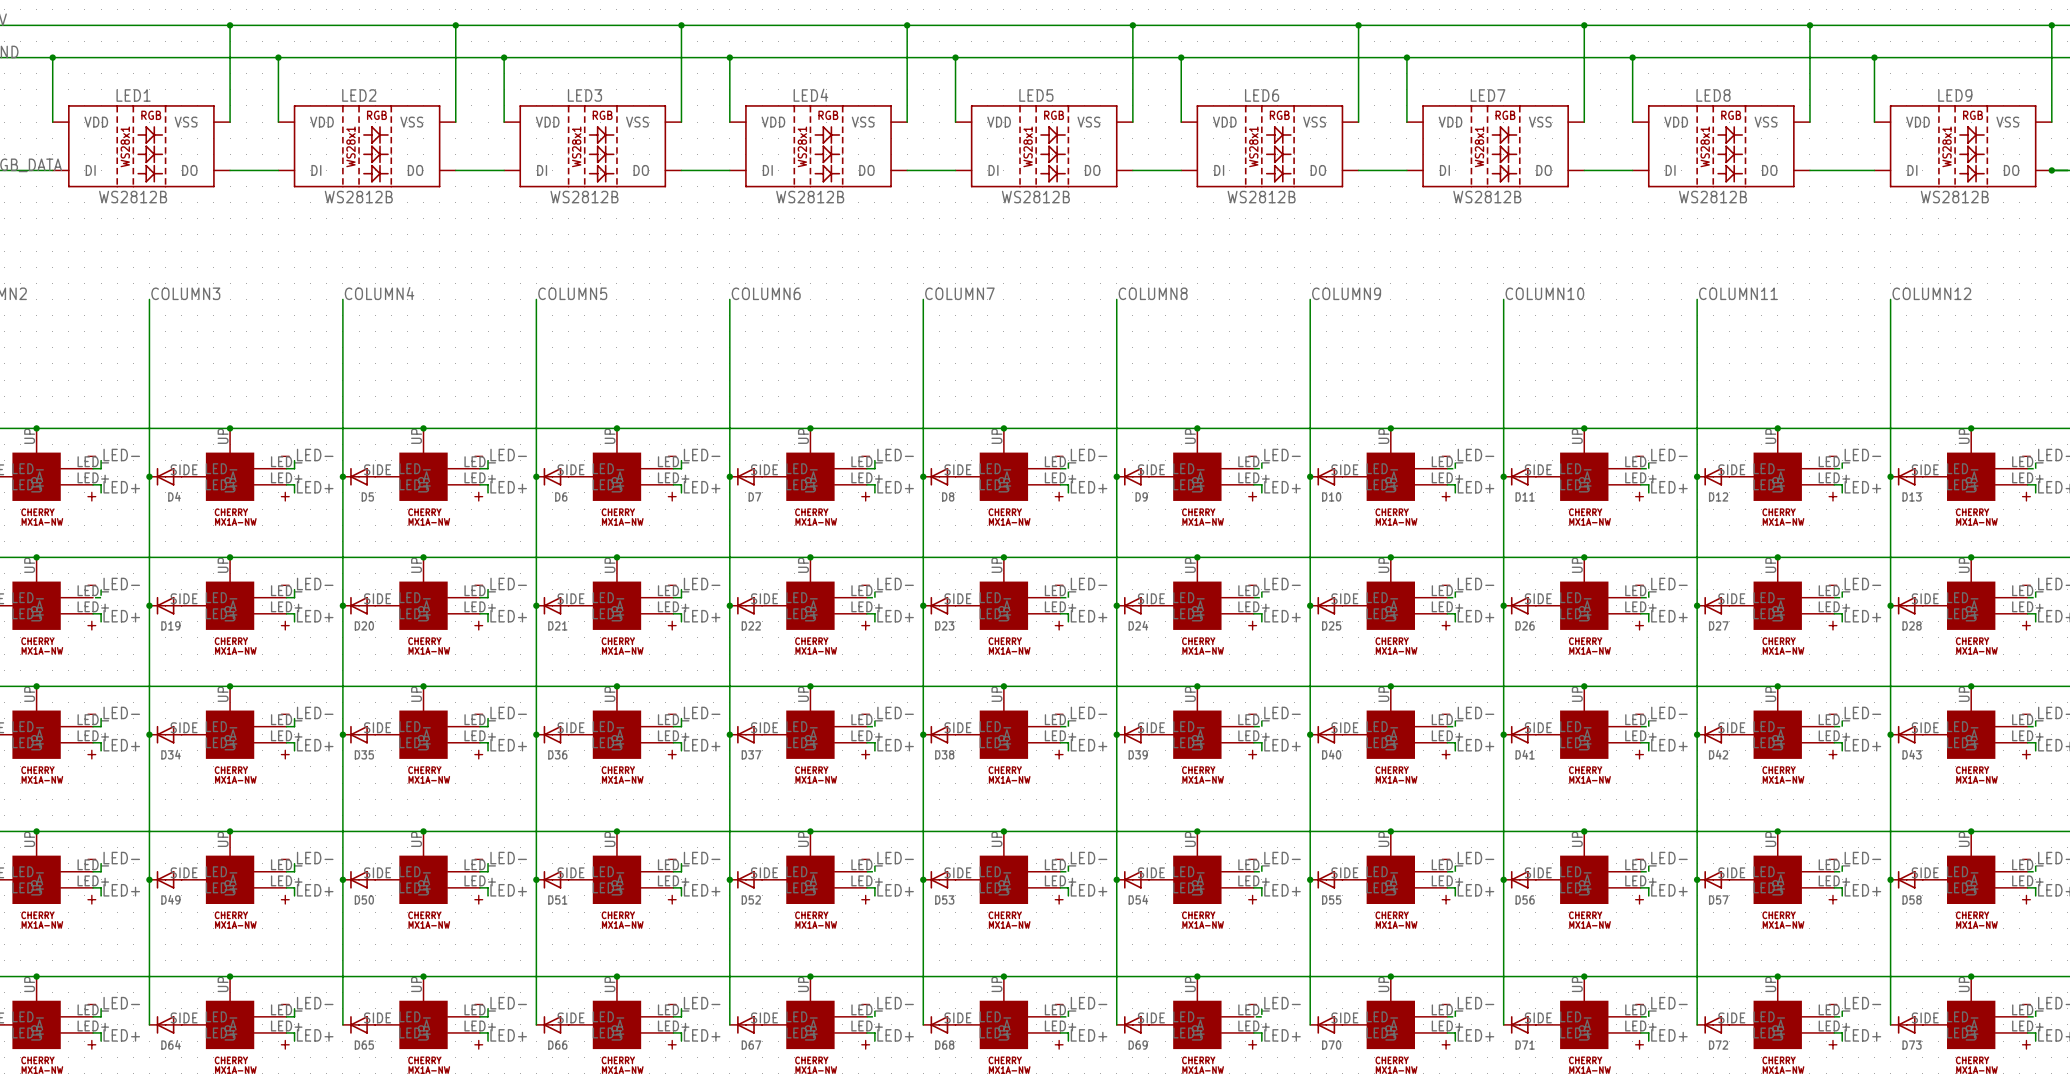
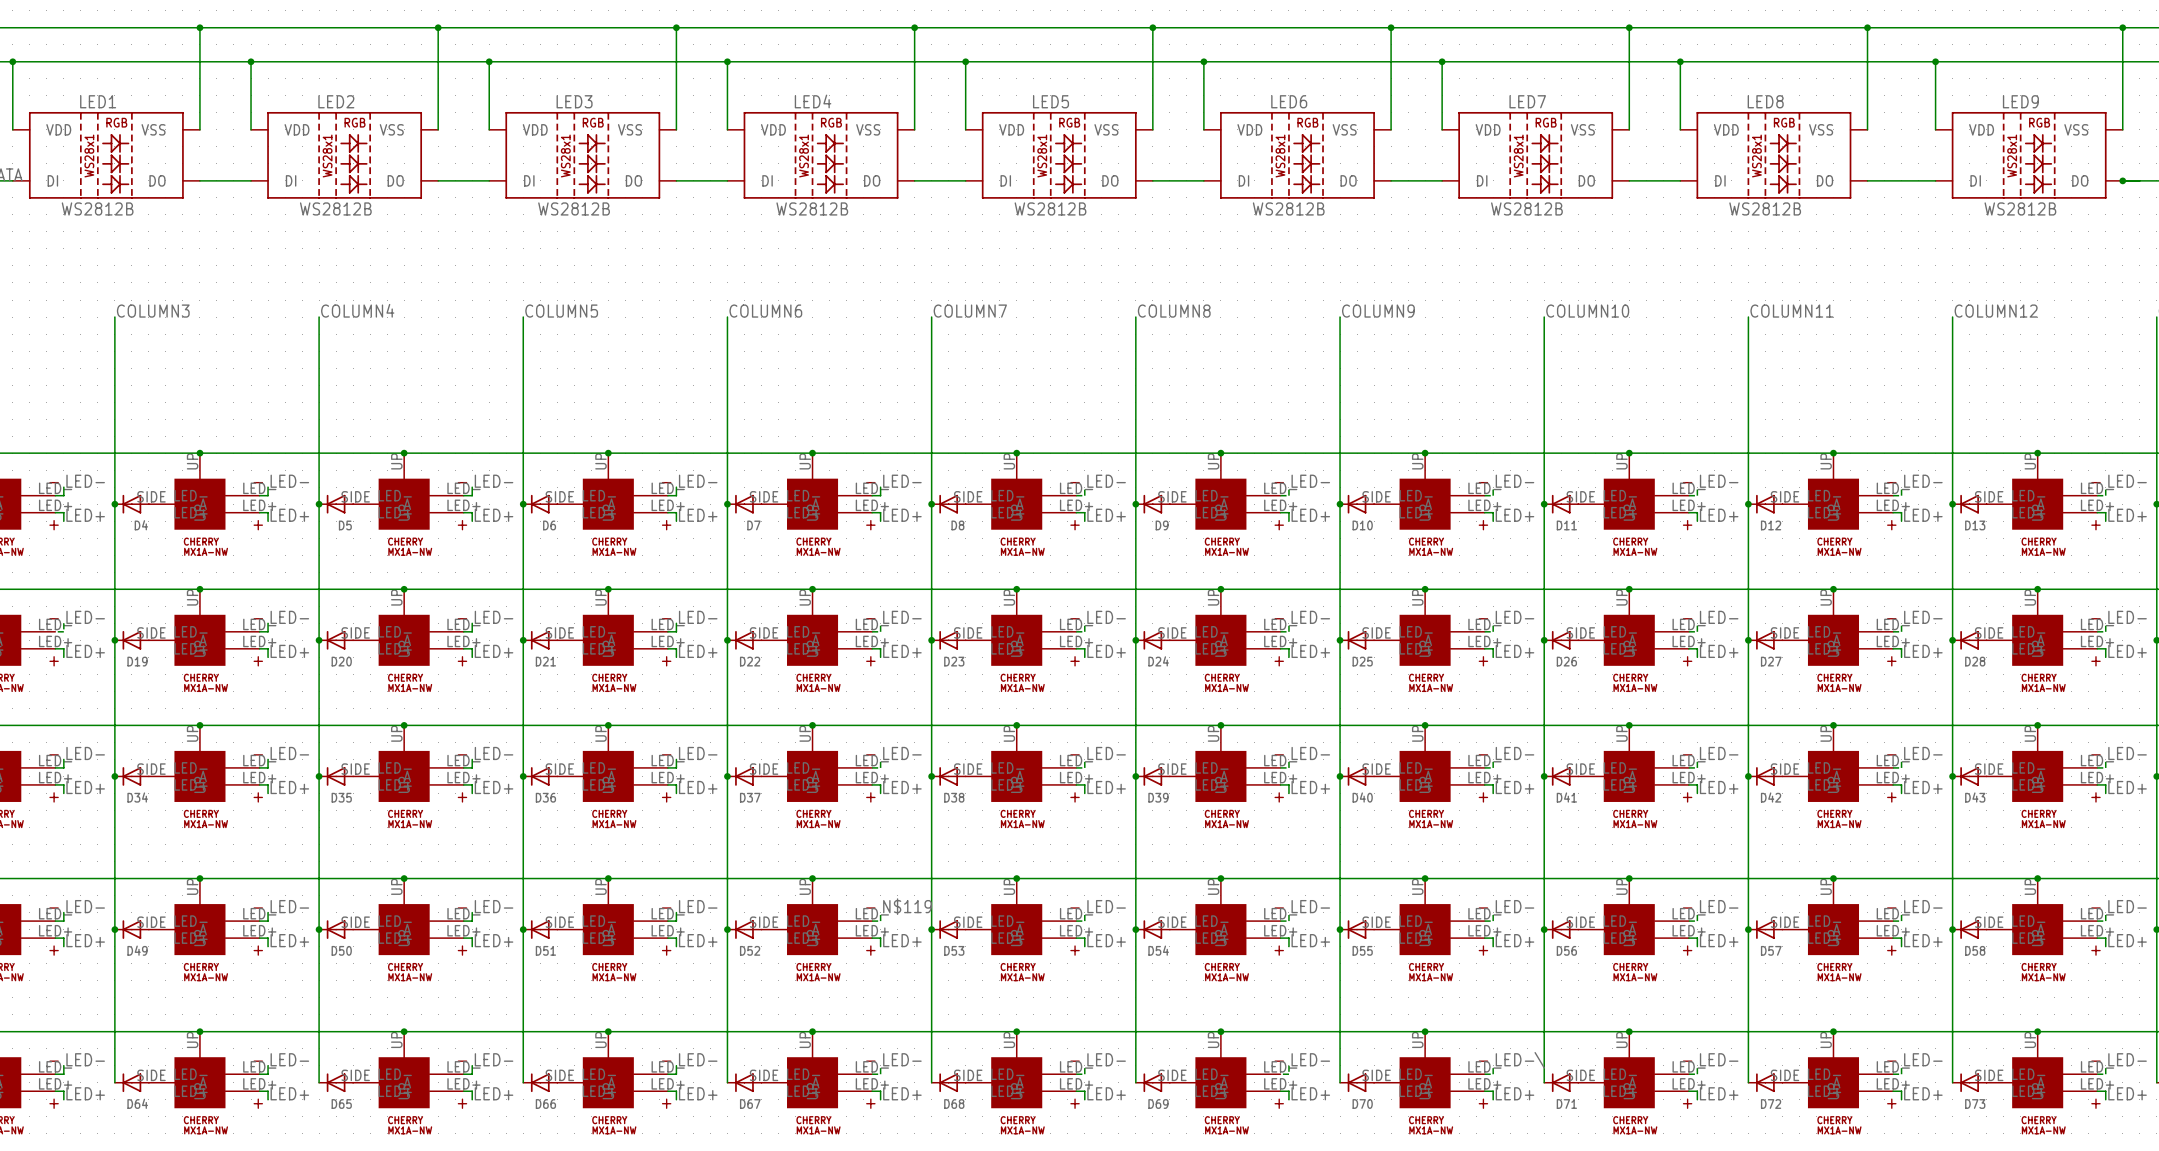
label: LED- (895, 858) -> N$119 (907, 906)
label: LED- (1475, 1003) -> LED-\ (1520, 1060)

